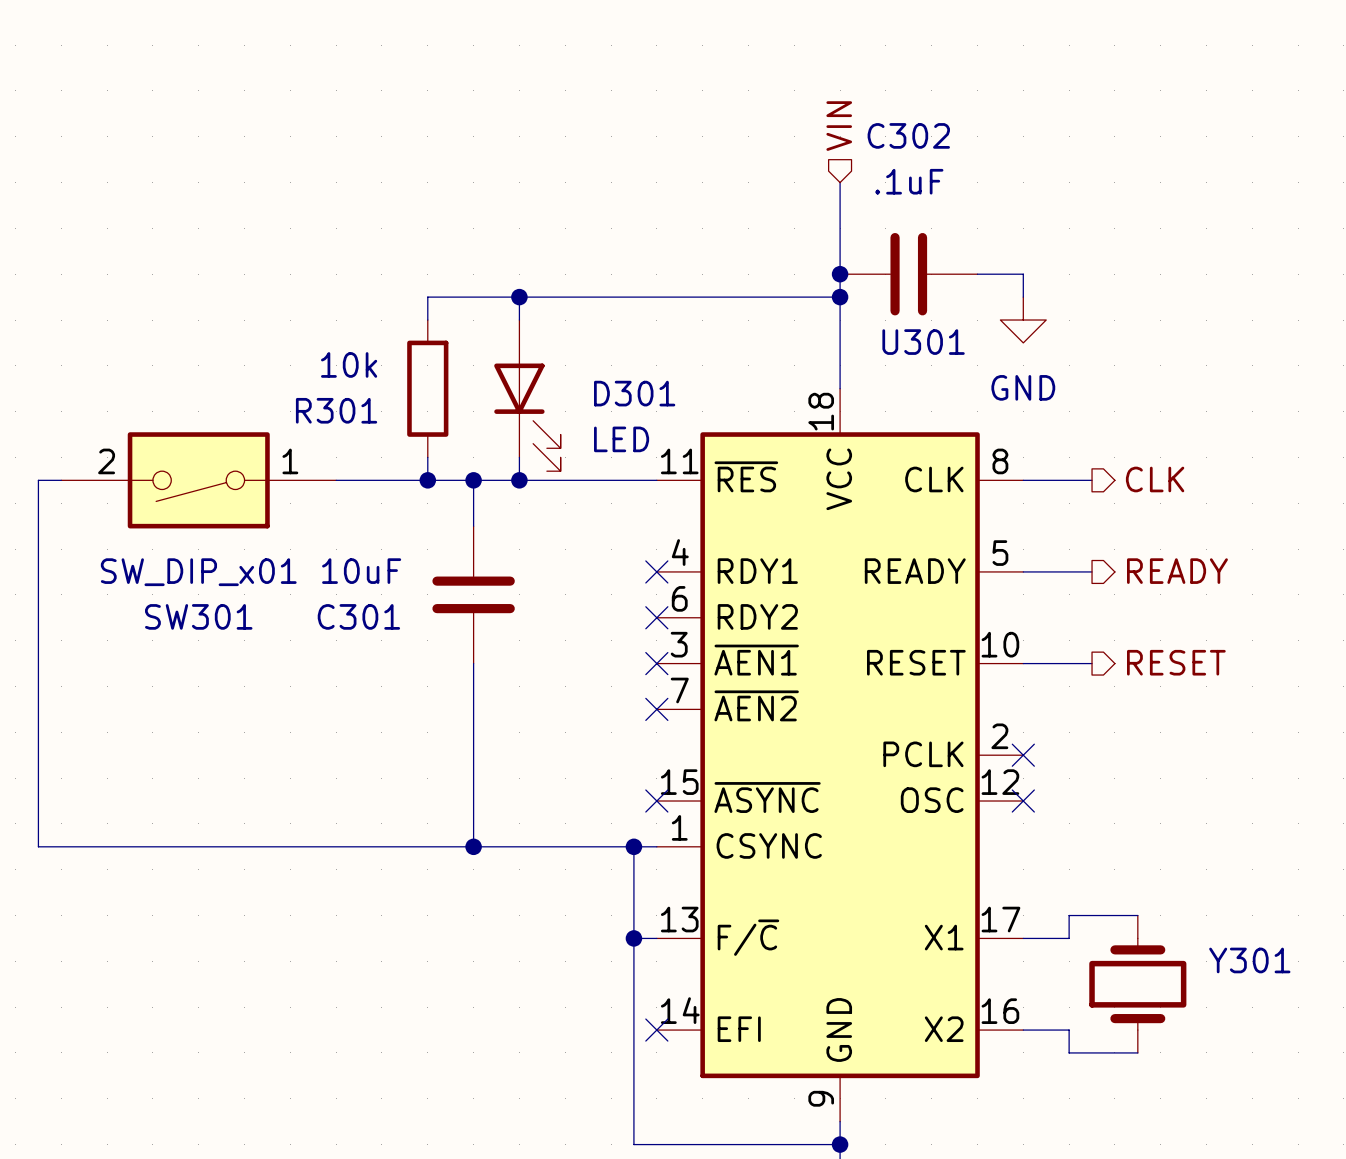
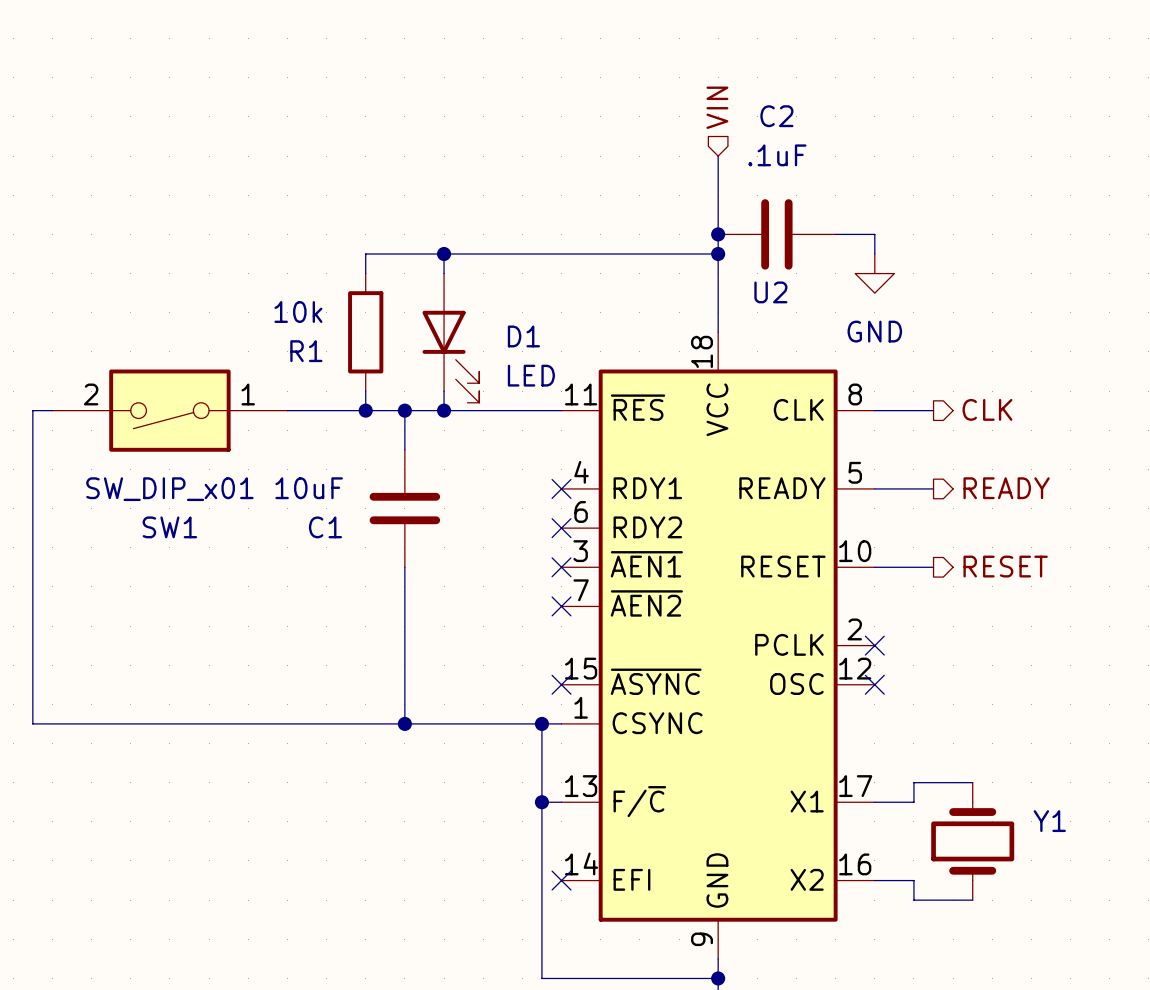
C302 name: C302 (908, 135) -> C2 (776, 116)
U301 name: U301 (923, 342) -> U2 (770, 292)
D301 name: D301 (634, 393) -> D1 (523, 336)
R301 name: R301 (336, 410) -> R1 (306, 351)
SW301 name: SW301 (198, 616) -> SW1 (169, 527)
C301 name: C301 (358, 616) -> C1 (325, 527)
Y301 name: Y301 (1249, 960) -> Y1 (1049, 821)

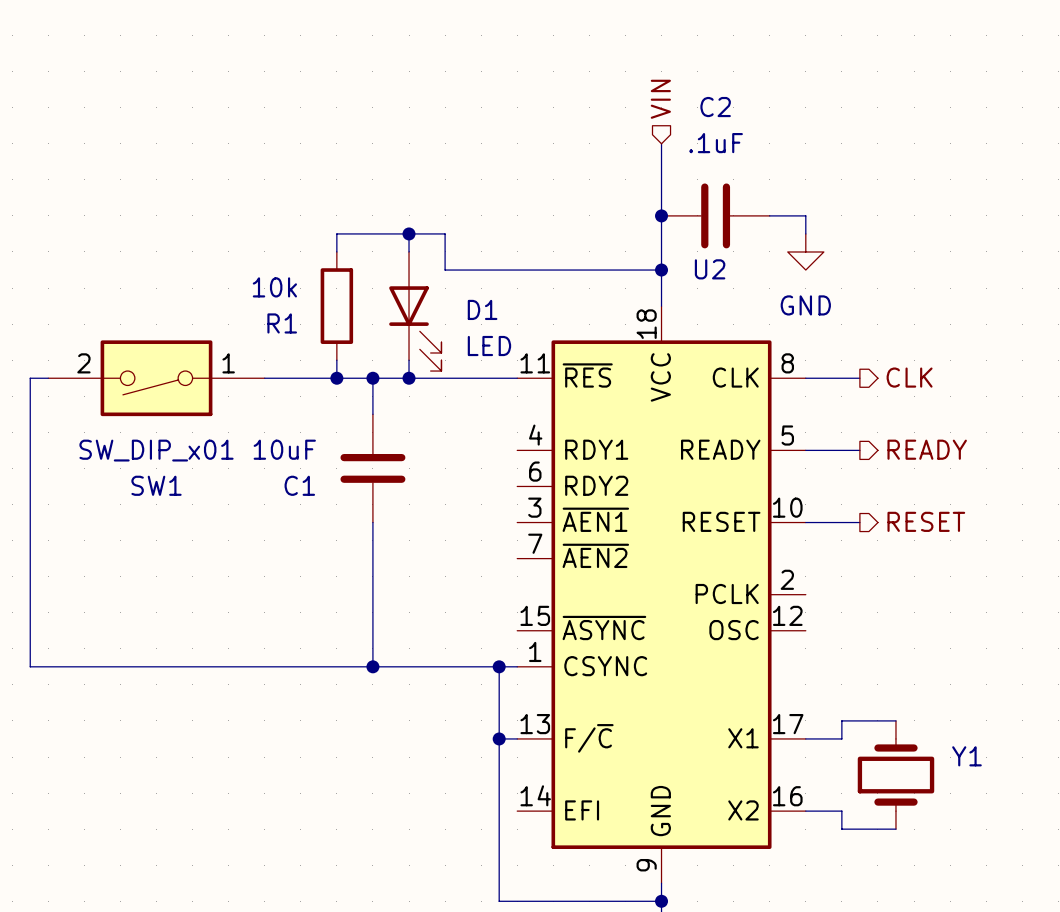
wire: (483, 253) (718, 253) -> (445, 233) (445, 270) (661, 270)
junction position: (718, 253) -> (661, 270)
no-connect mark: (561, 488) -> none
no-connect mark: (561, 528) -> none
no-connect mark: (561, 567) -> none
no-connect mark: (561, 606) -> none
no-connect mark: (874, 645) -> none
no-connect mark: (561, 684) -> none
no-connect mark: (874, 684) -> none
no-connect mark: (561, 880) -> none

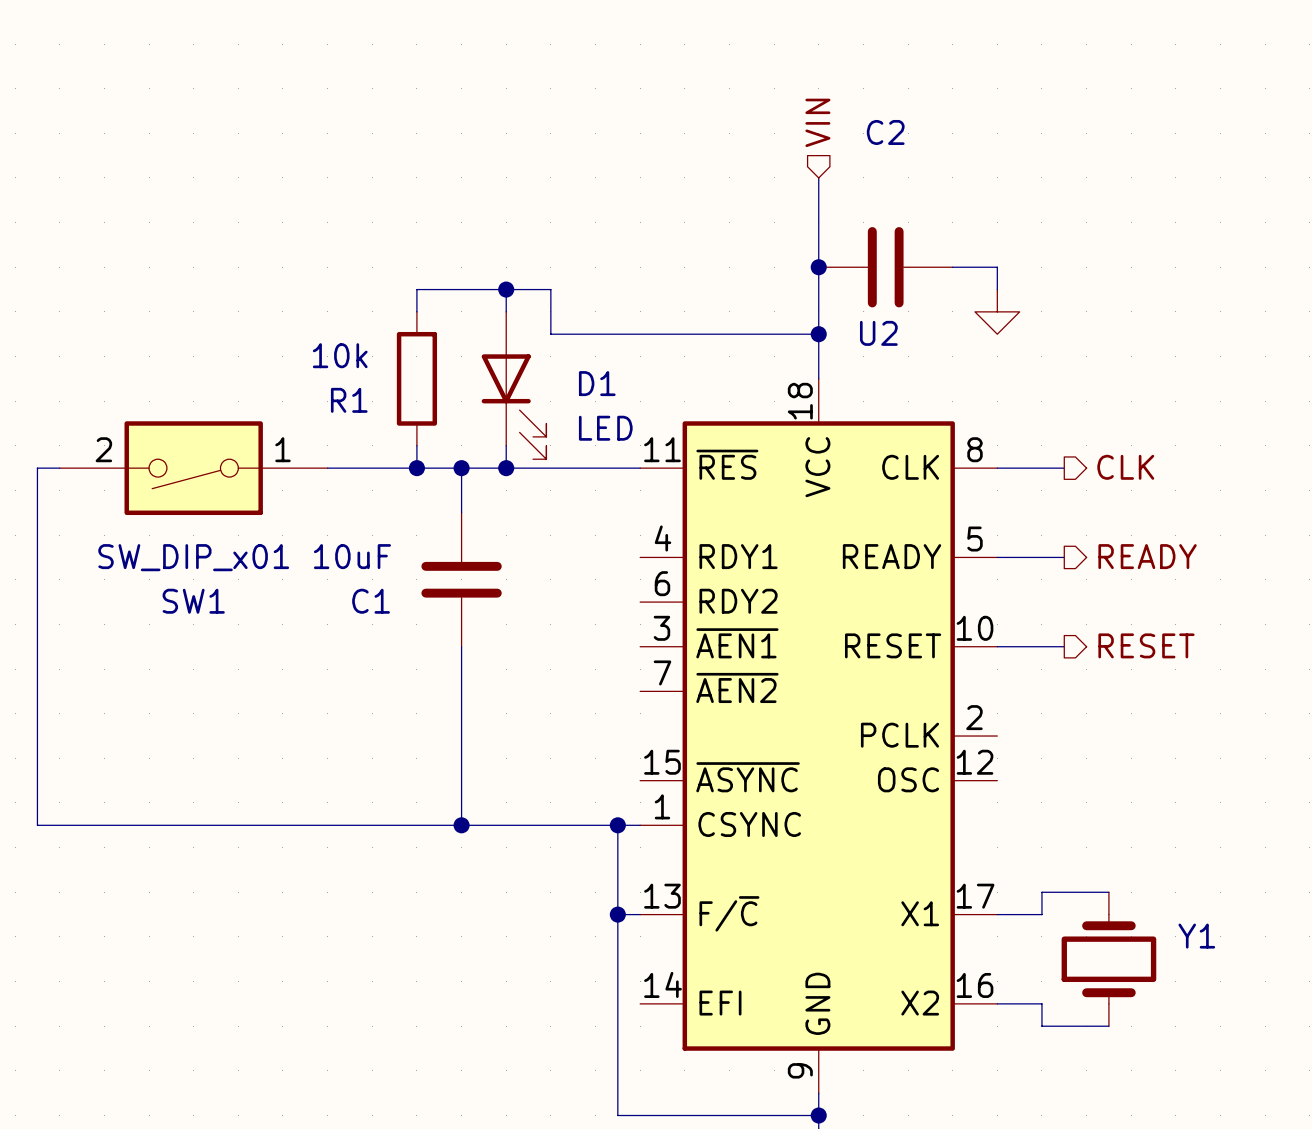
C2 value: .1uF (716, 143) -> none
power symbol text: GND (805, 305) -> none

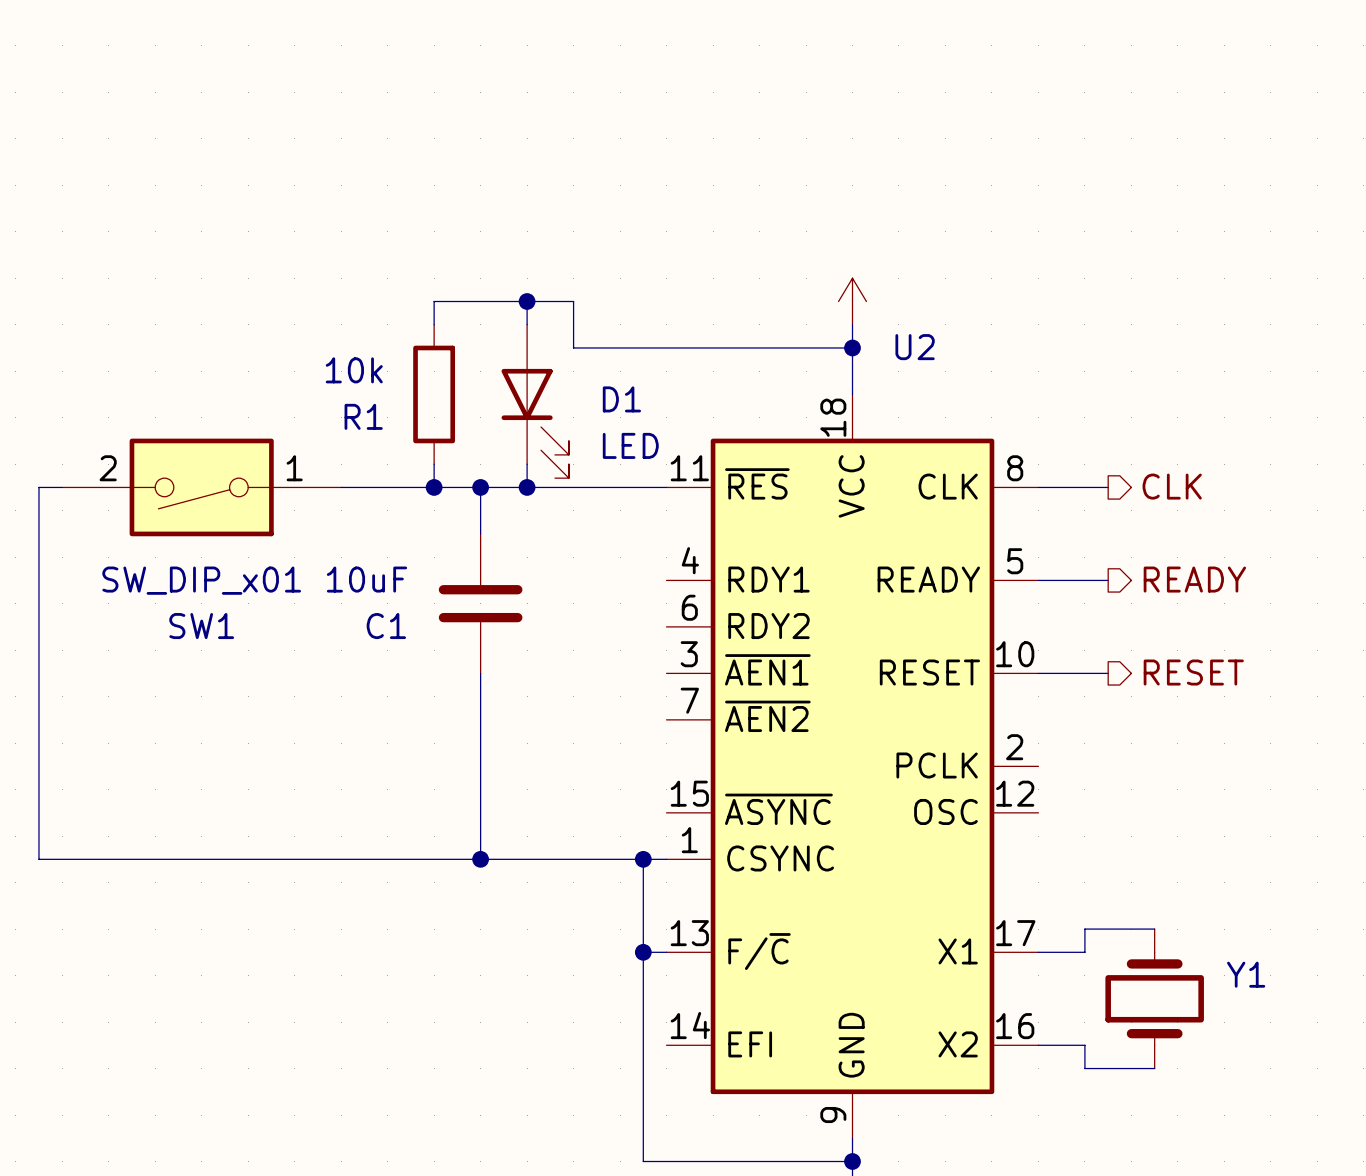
hierarchical label: VIN (817, 122) -> none
wire: (818, 177) (818, 311) -> none
junction: (818, 267) -> none
C2: (885, 267) -> none
wire: (952, 267) (997, 267) (997, 289) -> none
power symbol: none -> (852, 301)
power symbol: (997, 311) -> none

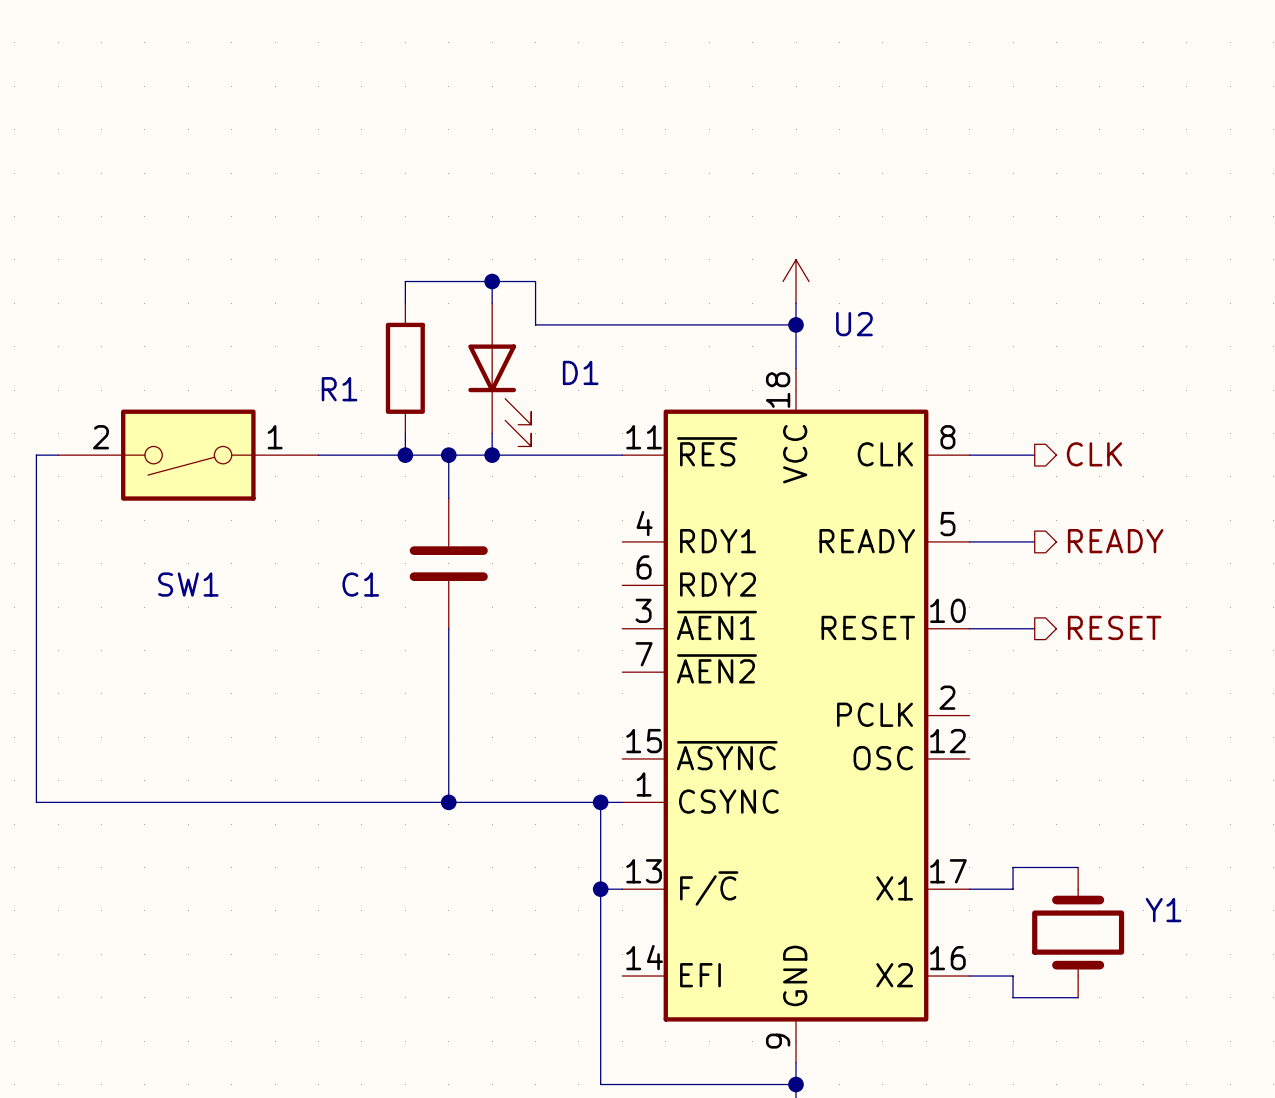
R1 value: 10k (354, 370) -> none
D1 value: LED (630, 445) -> none
C1 value: 10uF (366, 579) -> none
SW1 value: SW_DIP_x01 (201, 580) -> none

